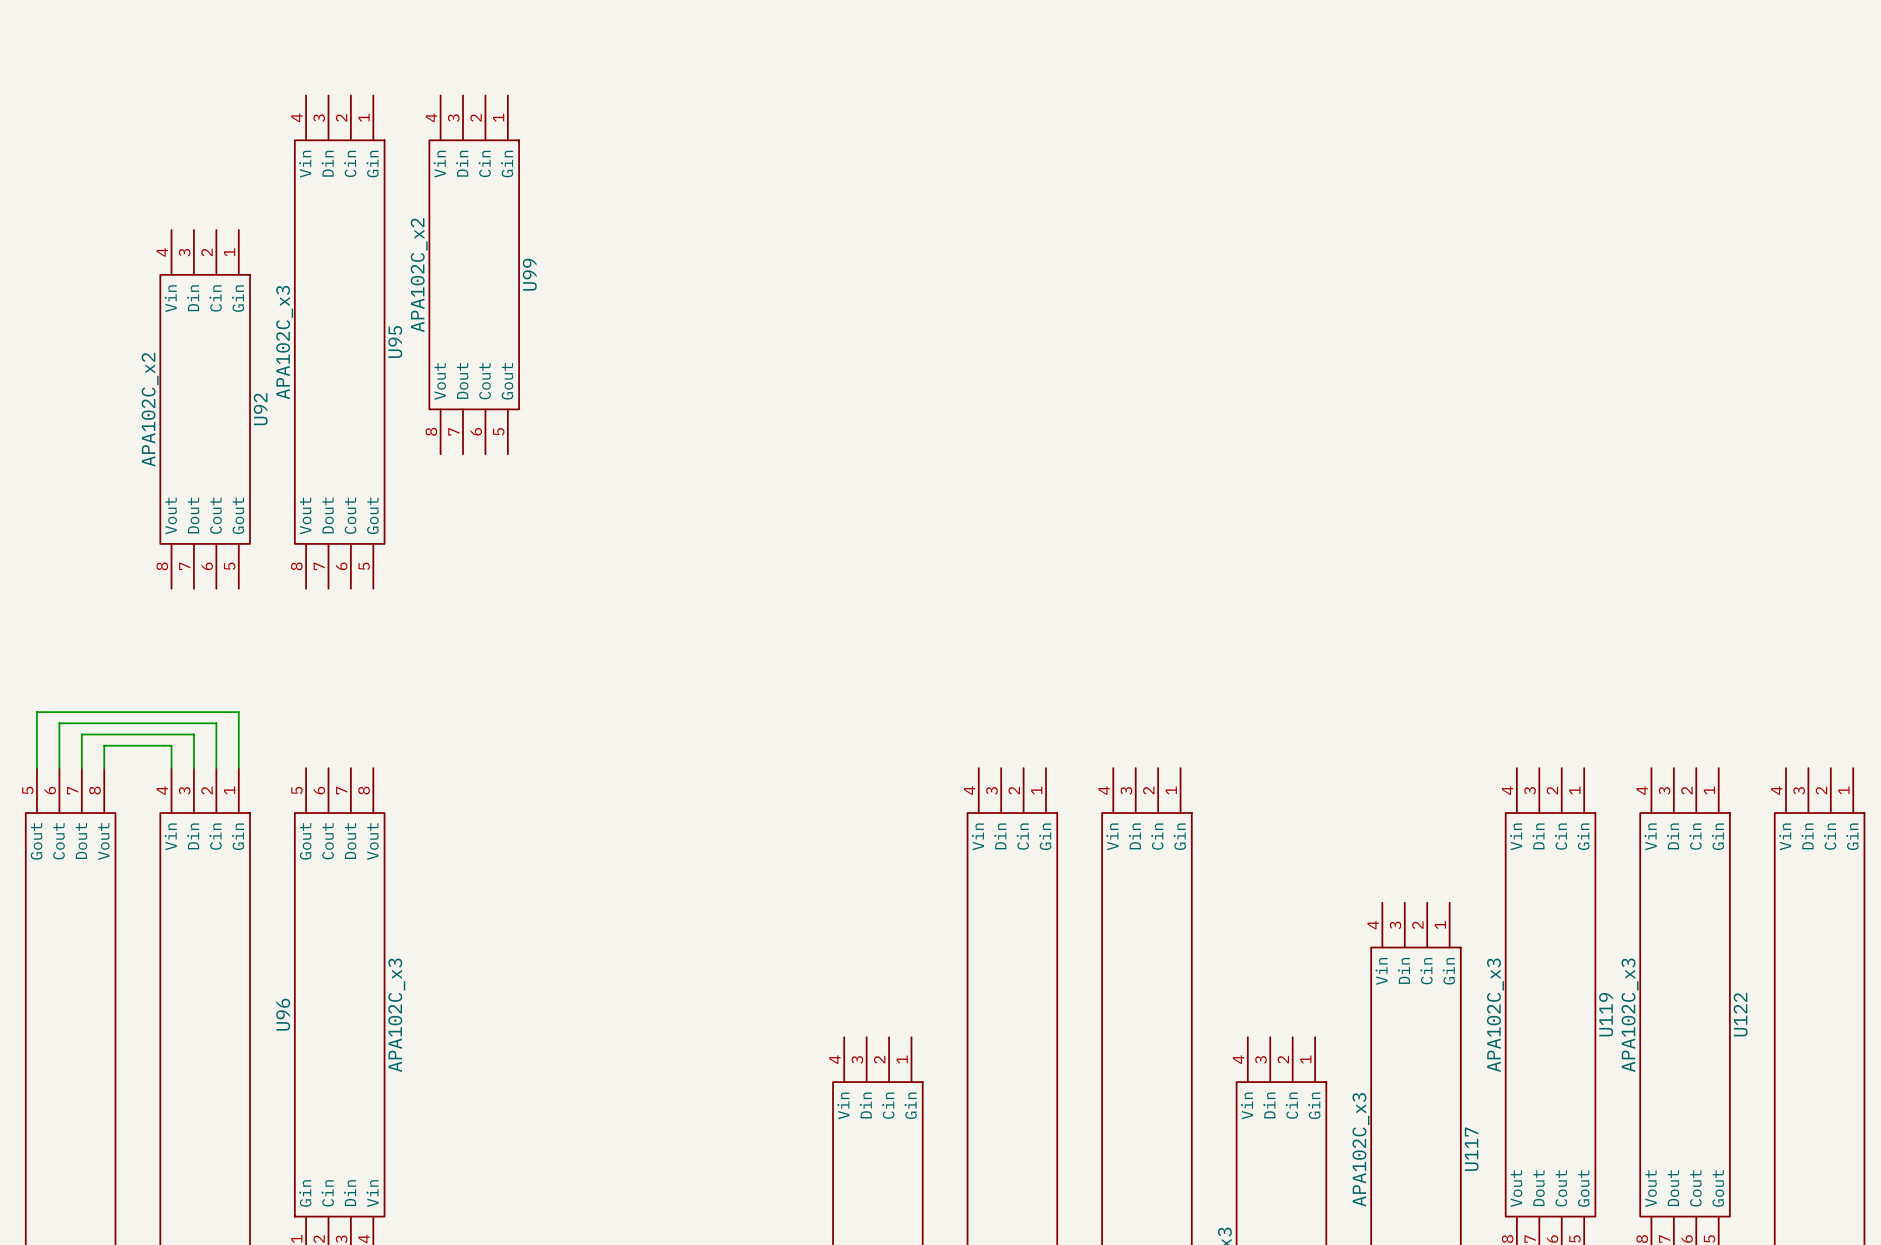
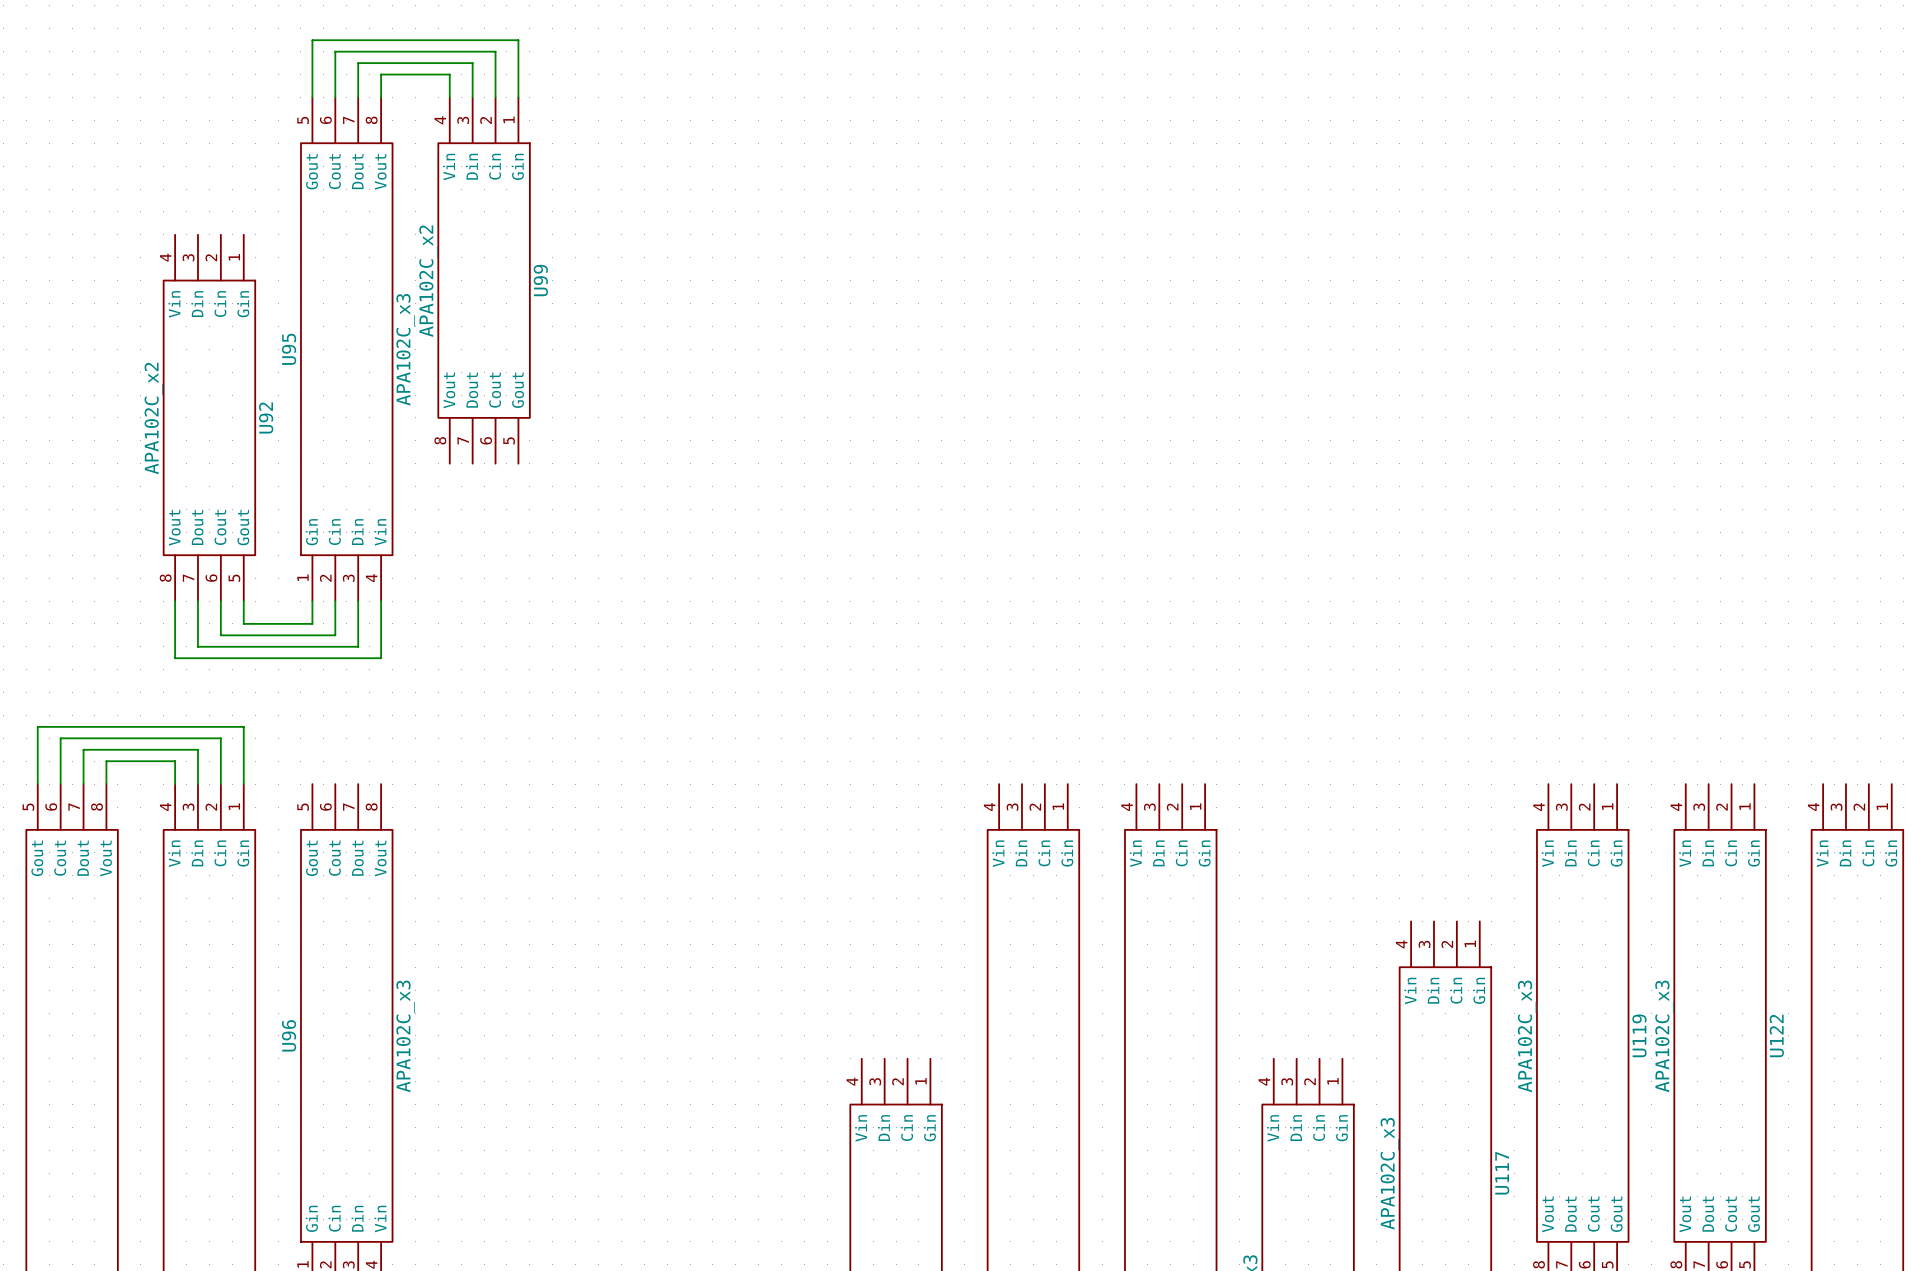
wire: none -> (312, 97) (312, 40) (518, 40) (518, 97)
wire: none -> (335, 97) (335, 51) (495, 51) (495, 97)
wire: none -> (358, 97) (358, 63) (472, 63) (472, 97)
wire: none -> (381, 97) (381, 74) (449, 74) (449, 97)
U95 rotation: 0° (339, 342) -> 180° (346, 349)
wire: none -> (175, 601) (175, 658) (381, 658) (381, 601)
wire: none -> (197, 601) (197, 646) (358, 646) (358, 601)
wire: none -> (220, 601) (220, 635) (335, 635) (335, 601)
wire: none -> (243, 601) (243, 623) (312, 623) (312, 601)

